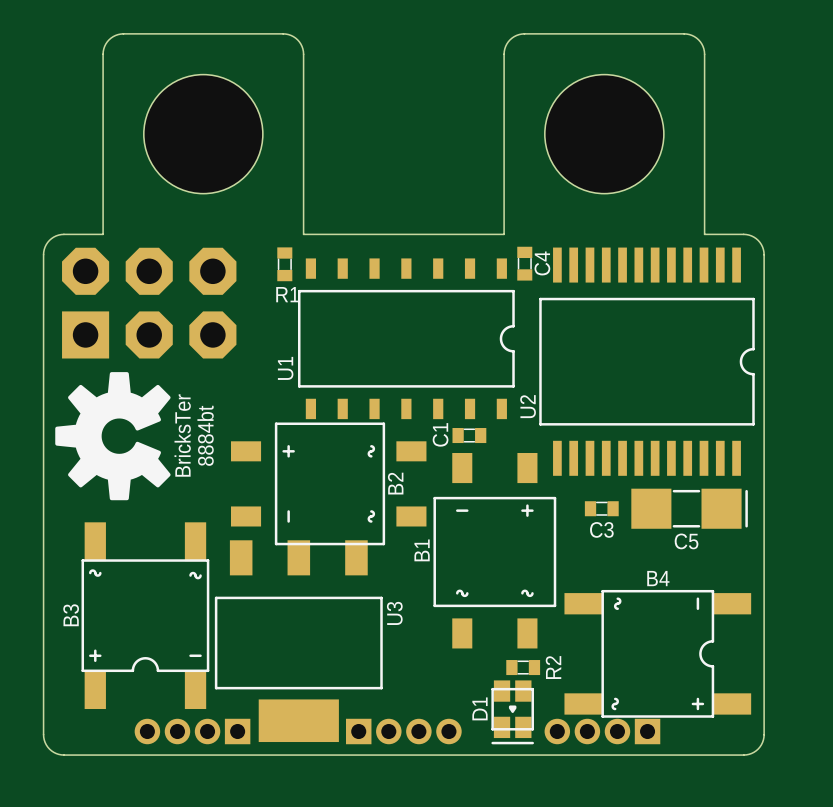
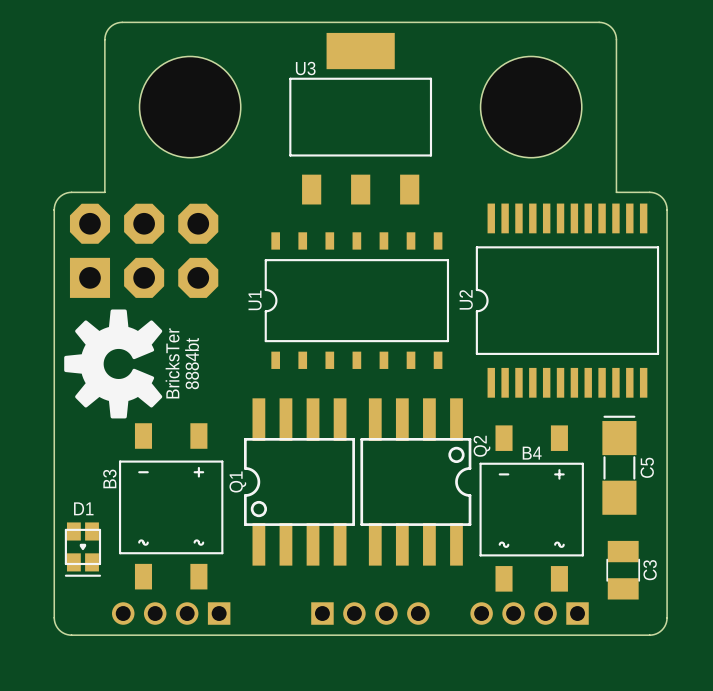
board edge: (103, 54) (107, 41) (113, 36) (120, 34) (283, 33) (291, 35) (297, 39) (302, 46) (303, 54) (303, 234) (504, 234) (504, 54) (506, 44) (516, 35) (686, 34) (694, 36) (700, 41) (704, 54) -> (104, 39) (109, 27) (122, 22) (599, 22) (611, 27) (616, 39)
C4: (524, 263) -> none
R1: (284, 264) -> none
U1 rotation: 0° (406, 338) -> 180° (356, 300)
U2 rotation: 0° (646, 361) -> 180° (567, 300)
C1: (469, 435) -> none
B2: (328, 483) -> none
C3 footprint: [584, 501, 619, 517] -> [606, 540, 641, 600]
C5 rotation: 0° (689, 508) -> 90° counterclockwise (619, 465)
B3 footprint: [81, 522, 210, 710] -> [118, 423, 224, 590]
B1: (494, 550) -> none
Q1: none -> (299, 481)
Q2: none -> (415, 481)
B4 footprint: [564, 589, 752, 718] -> [479, 425, 584, 592]
U3 name position: U3 (394, 613) -> U3 (305, 68)
U3 rotation: 0° (298, 641) -> 180° (360, 118)
U3 position: (298, 641) -> (360, 118)
R2: (523, 667) -> none
D1 name rotation: 0° (479, 708) -> 90° clockwise (83, 508)
D1 name position: D1 (479, 708) -> D1 (83, 508)
D1 position: (512, 712) -> (82, 549)
part footprint: [134, 718, 251, 745] -> [111, 602, 231, 625]
part footprint: [346, 718, 462, 745] -> [311, 602, 430, 625]
part footprint: [544, 718, 661, 745] -> [470, 602, 589, 625]

